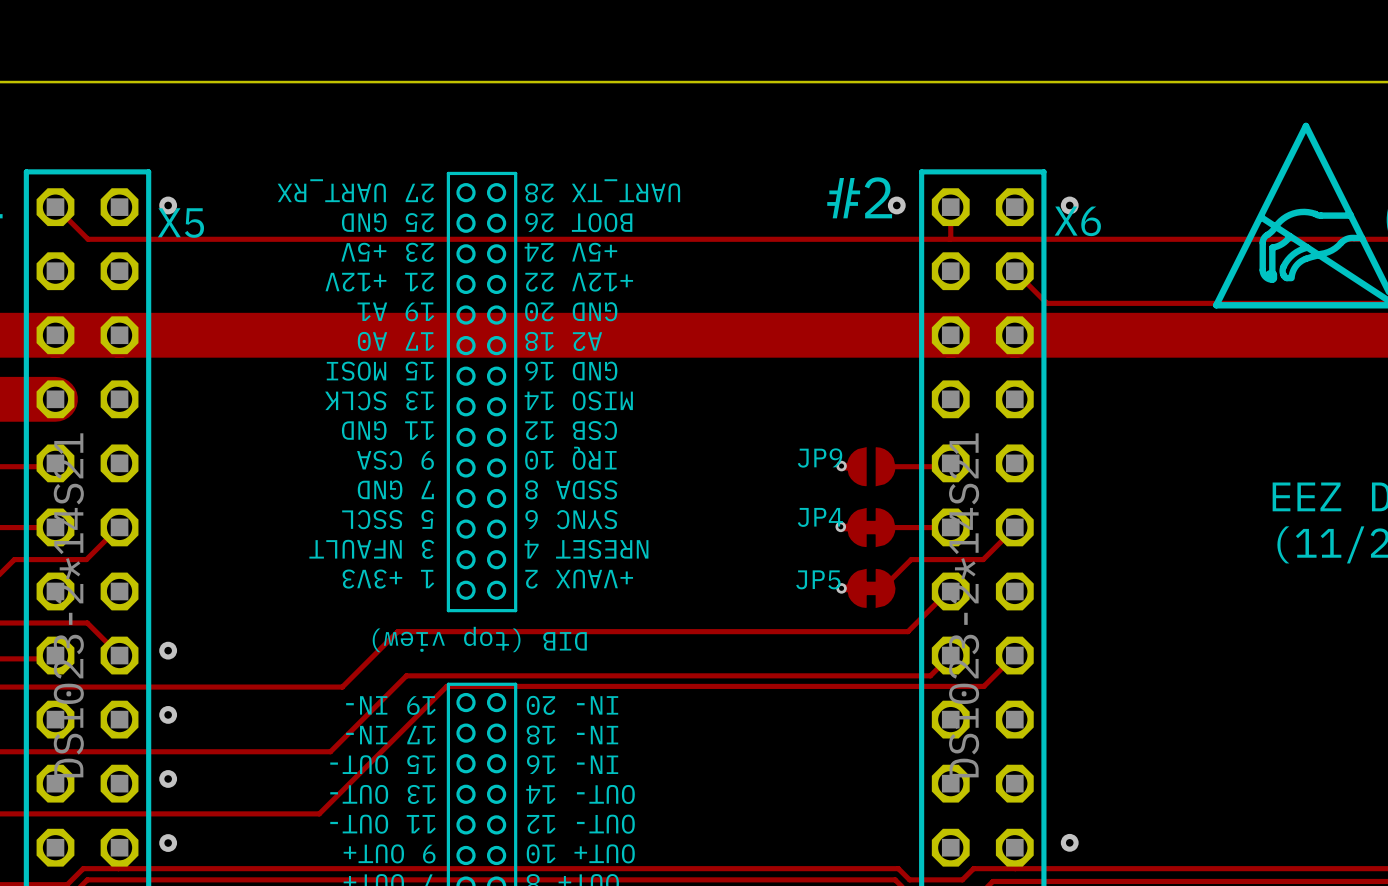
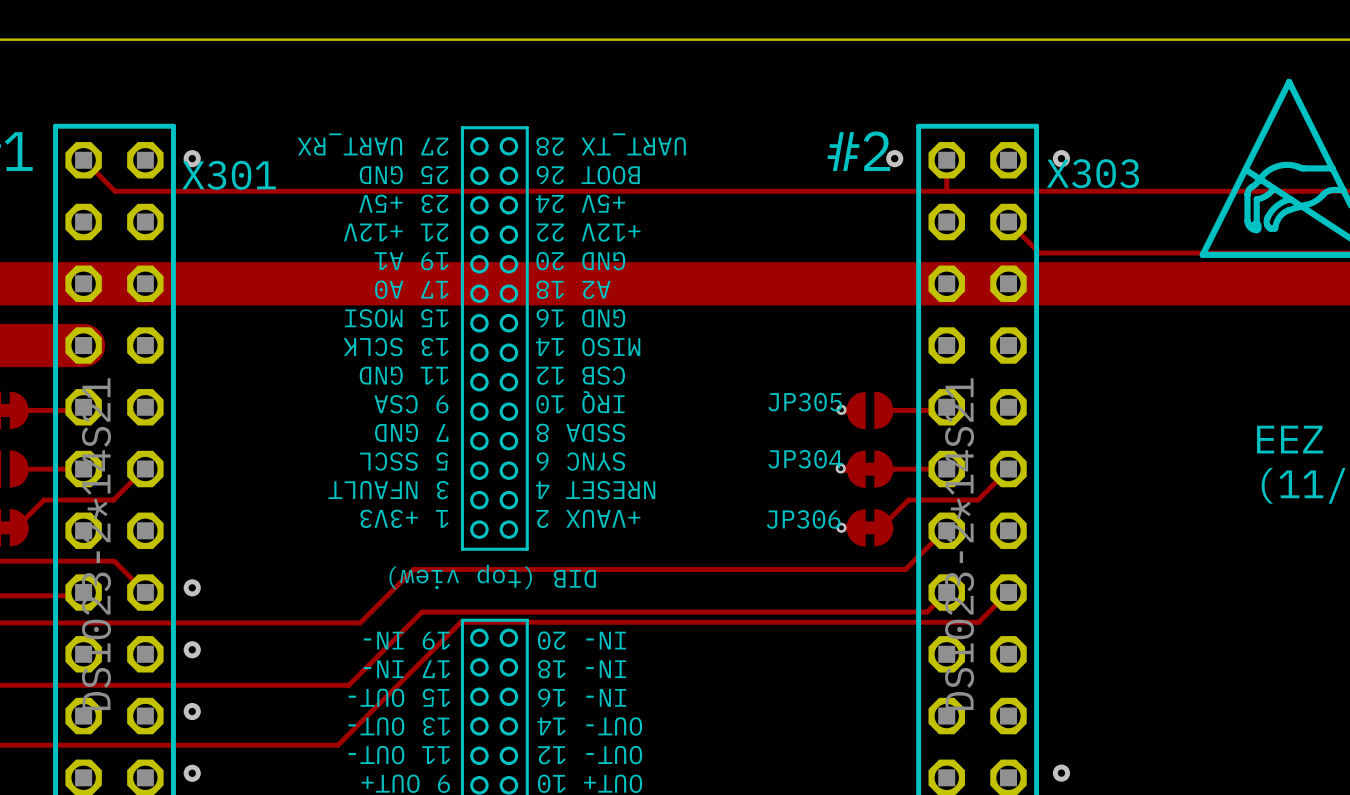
X6 name: X6 (1077, 221) -> X303 (1092, 173)
X5 name: X5 (180, 223) -> X301 (229, 175)
JP9 name: JP9 (820, 458) -> JP305 (805, 402)
JP4 name: JP4 (820, 517) -> JP304 (805, 459)
JP5 name: JP5 (818, 579) -> JP306 (803, 519)

